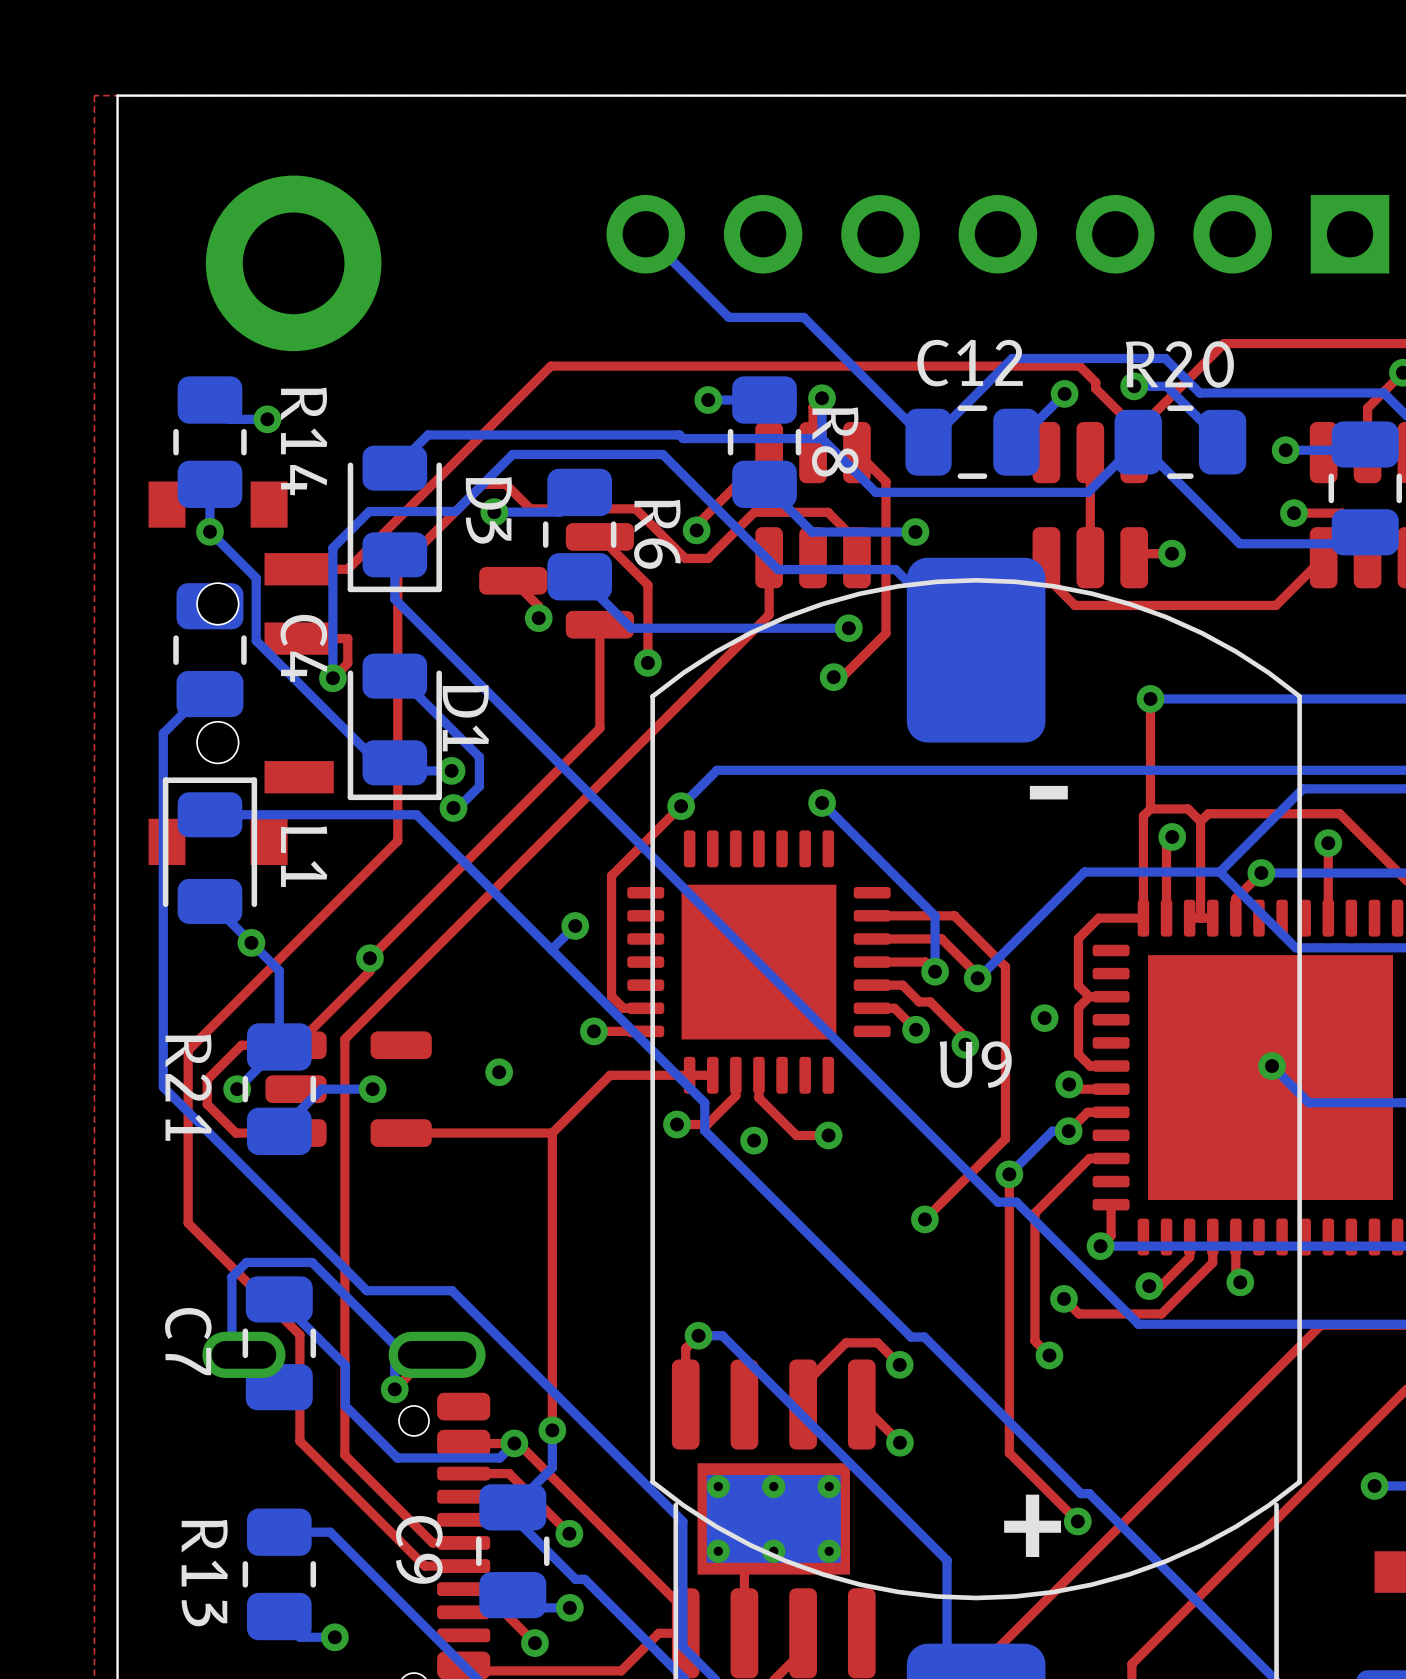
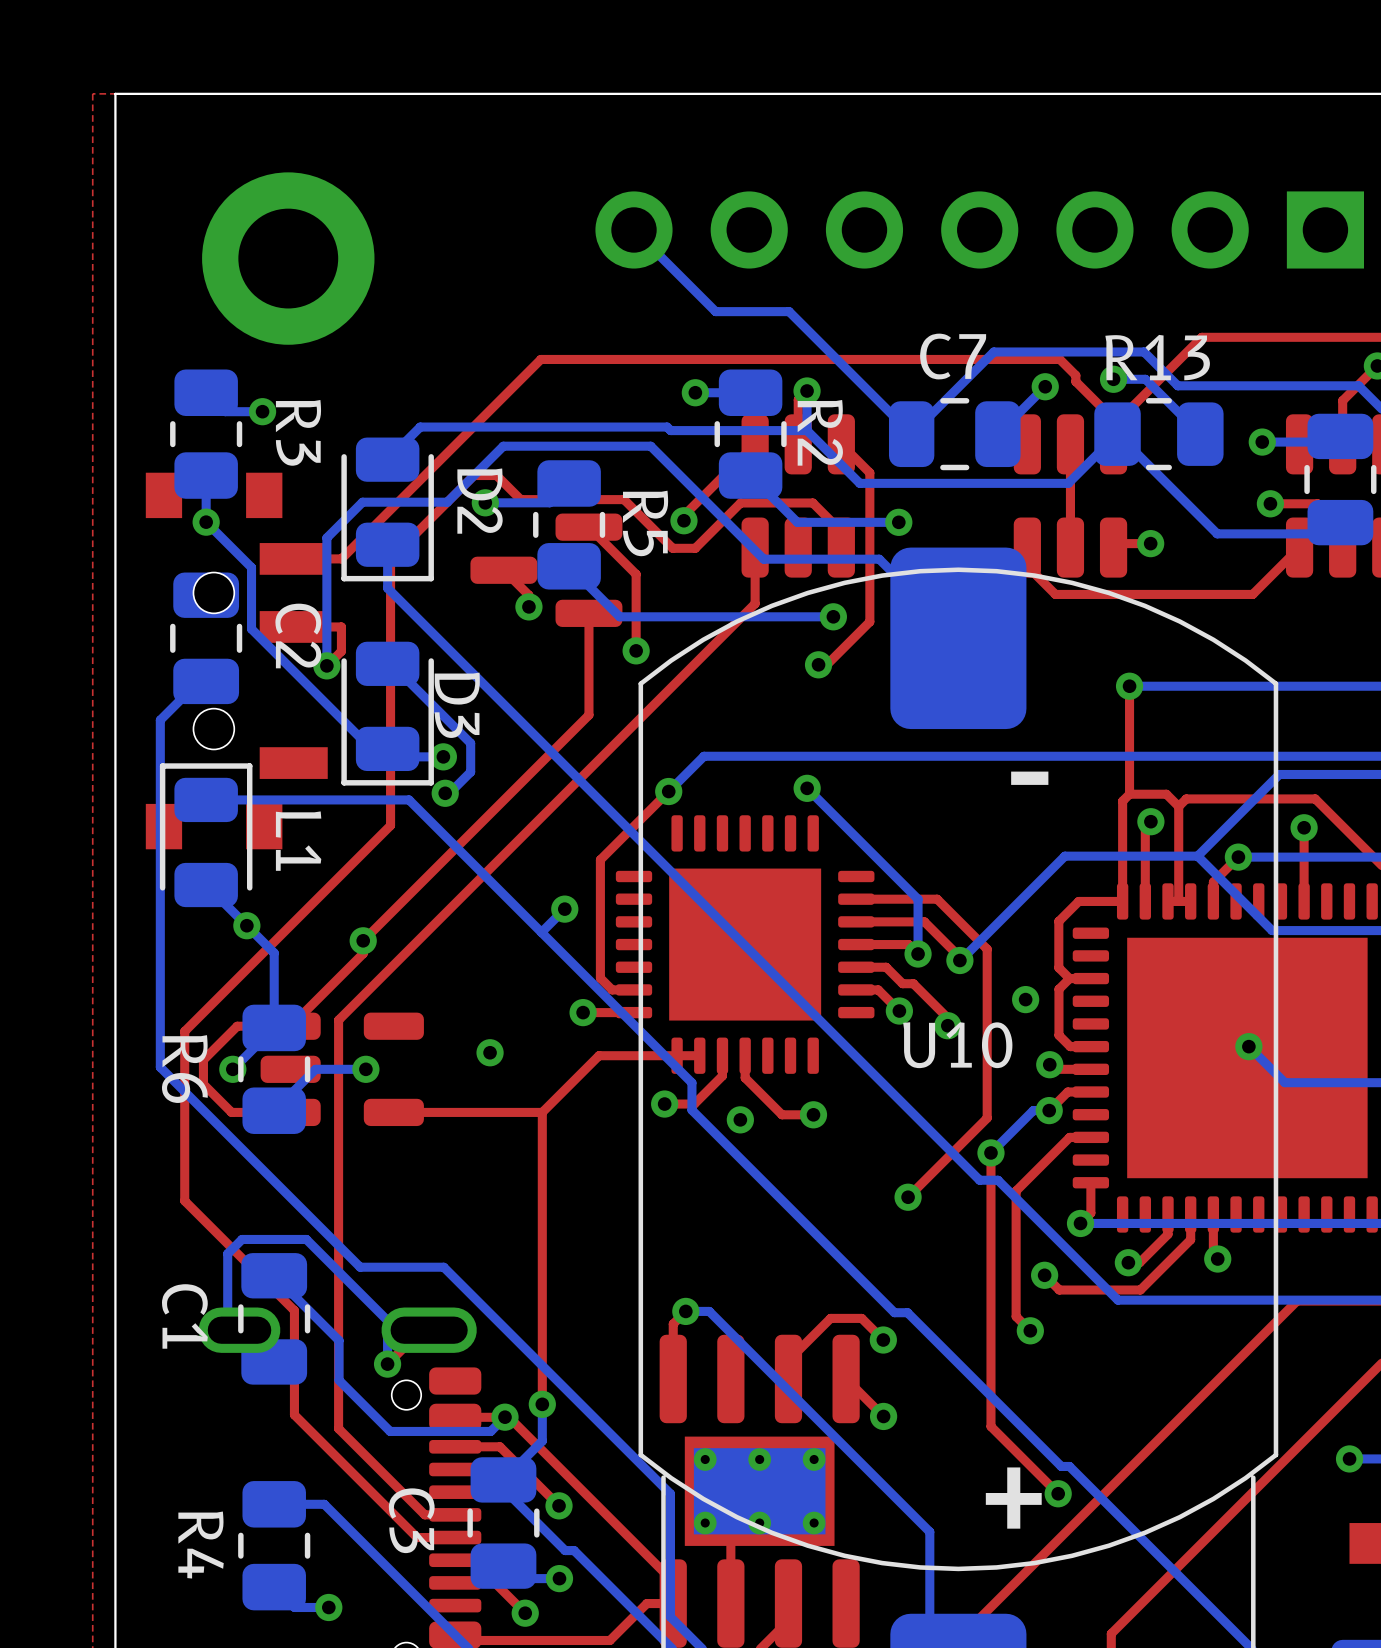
C12 name: C12 (970, 363) -> C7 (953, 356)
R20 name: R20 (1179, 364) -> R13 (1157, 357)
R14 name: R14 (304, 441) -> R3 (298, 432)
R8 name: R8 (835, 441) -> R2 (820, 432)
D3 name: D3 (488, 510) -> D2 (480, 501)
R6 name: R6 (657, 534) -> R5 (645, 523)
C4 name: C4 (303, 648) -> C2 (298, 635)
D1 name: D1 (465, 718) -> D3 (457, 705)
U9 name: U9 (975, 1064) -> U10 (957, 1045)
R21 name: R21 (188, 1087) -> R6 (184, 1069)
C7 name: C7 (188, 1341) -> C1 (184, 1316)
C9 name: C9 (419, 1549) -> C3 (411, 1520)
R13 name: R13 (204, 1573) -> R4 (201, 1545)

